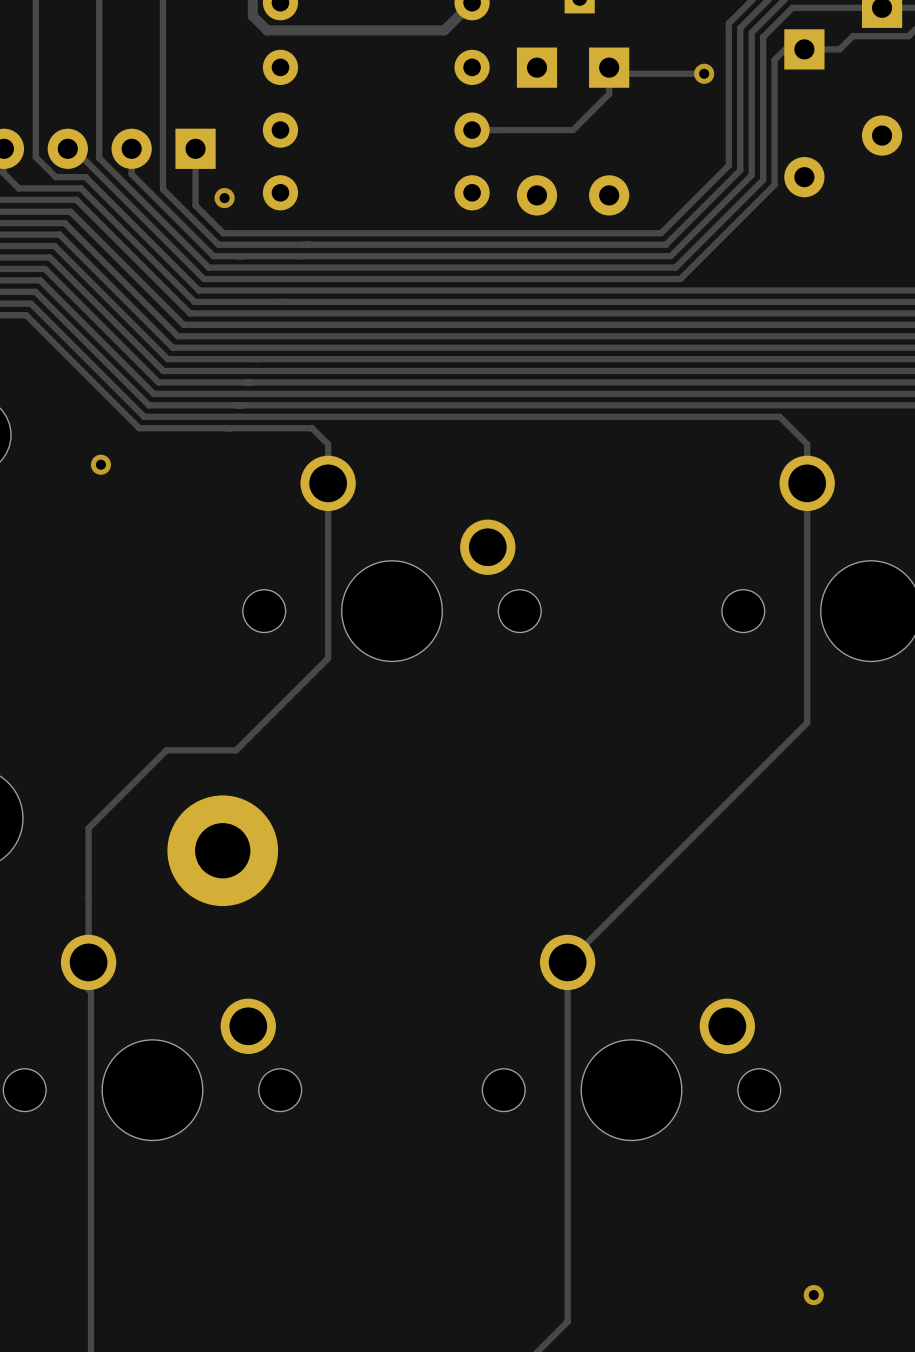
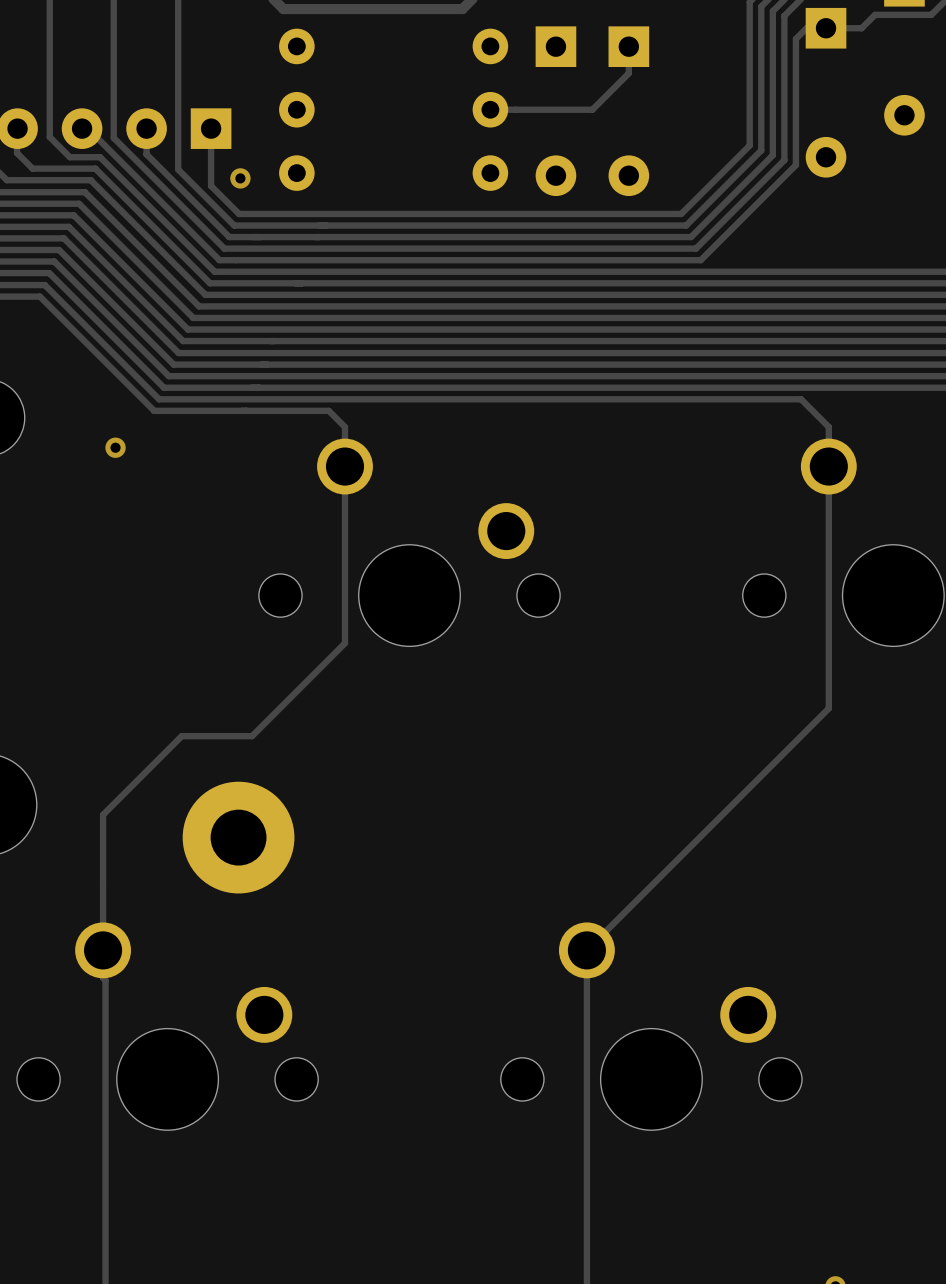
track: (609, 67) (615, 73) (704, 73) -> none
via: (704, 73) -> none

